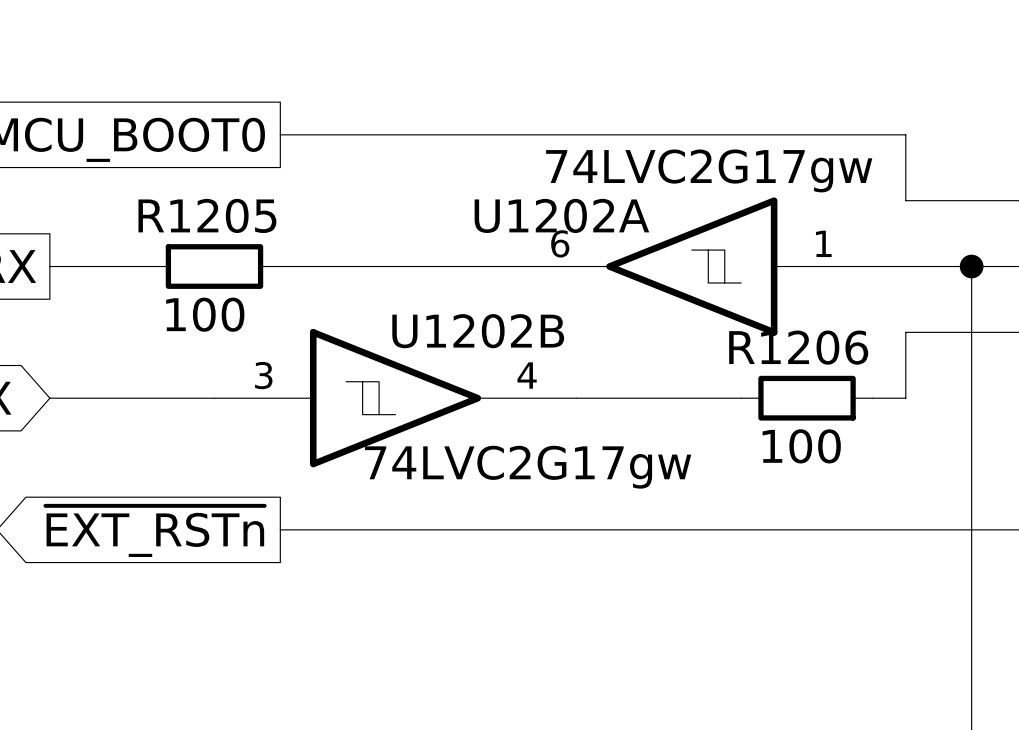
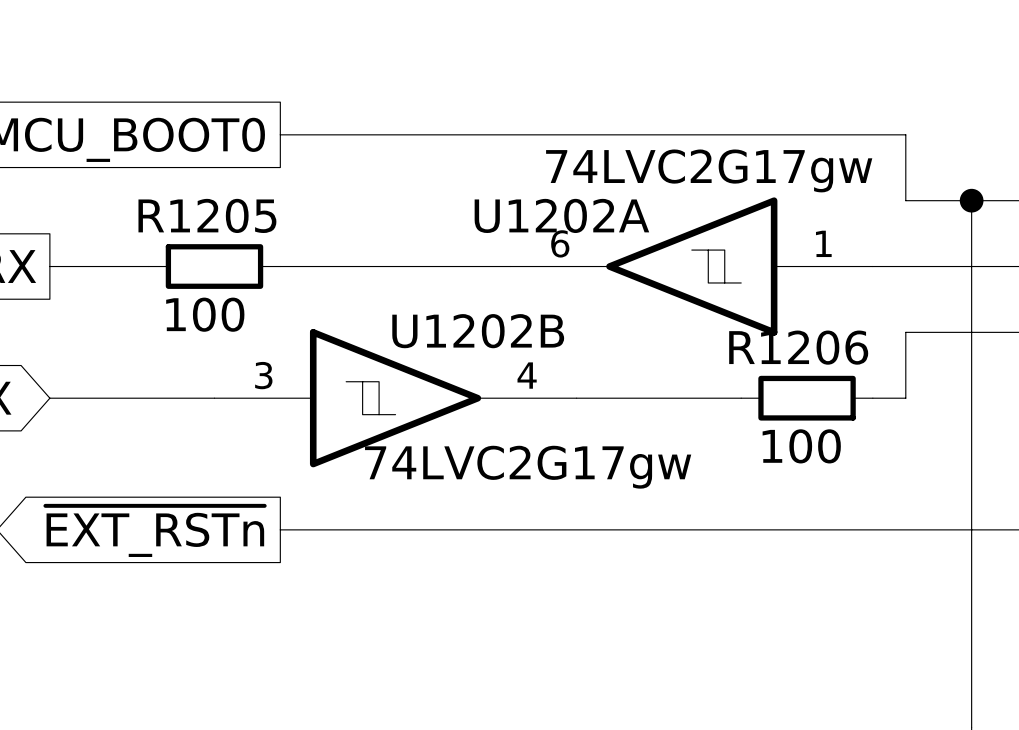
wire: none -> (971, 200) (971, 266)
junction position: (971, 266) -> (971, 200)

